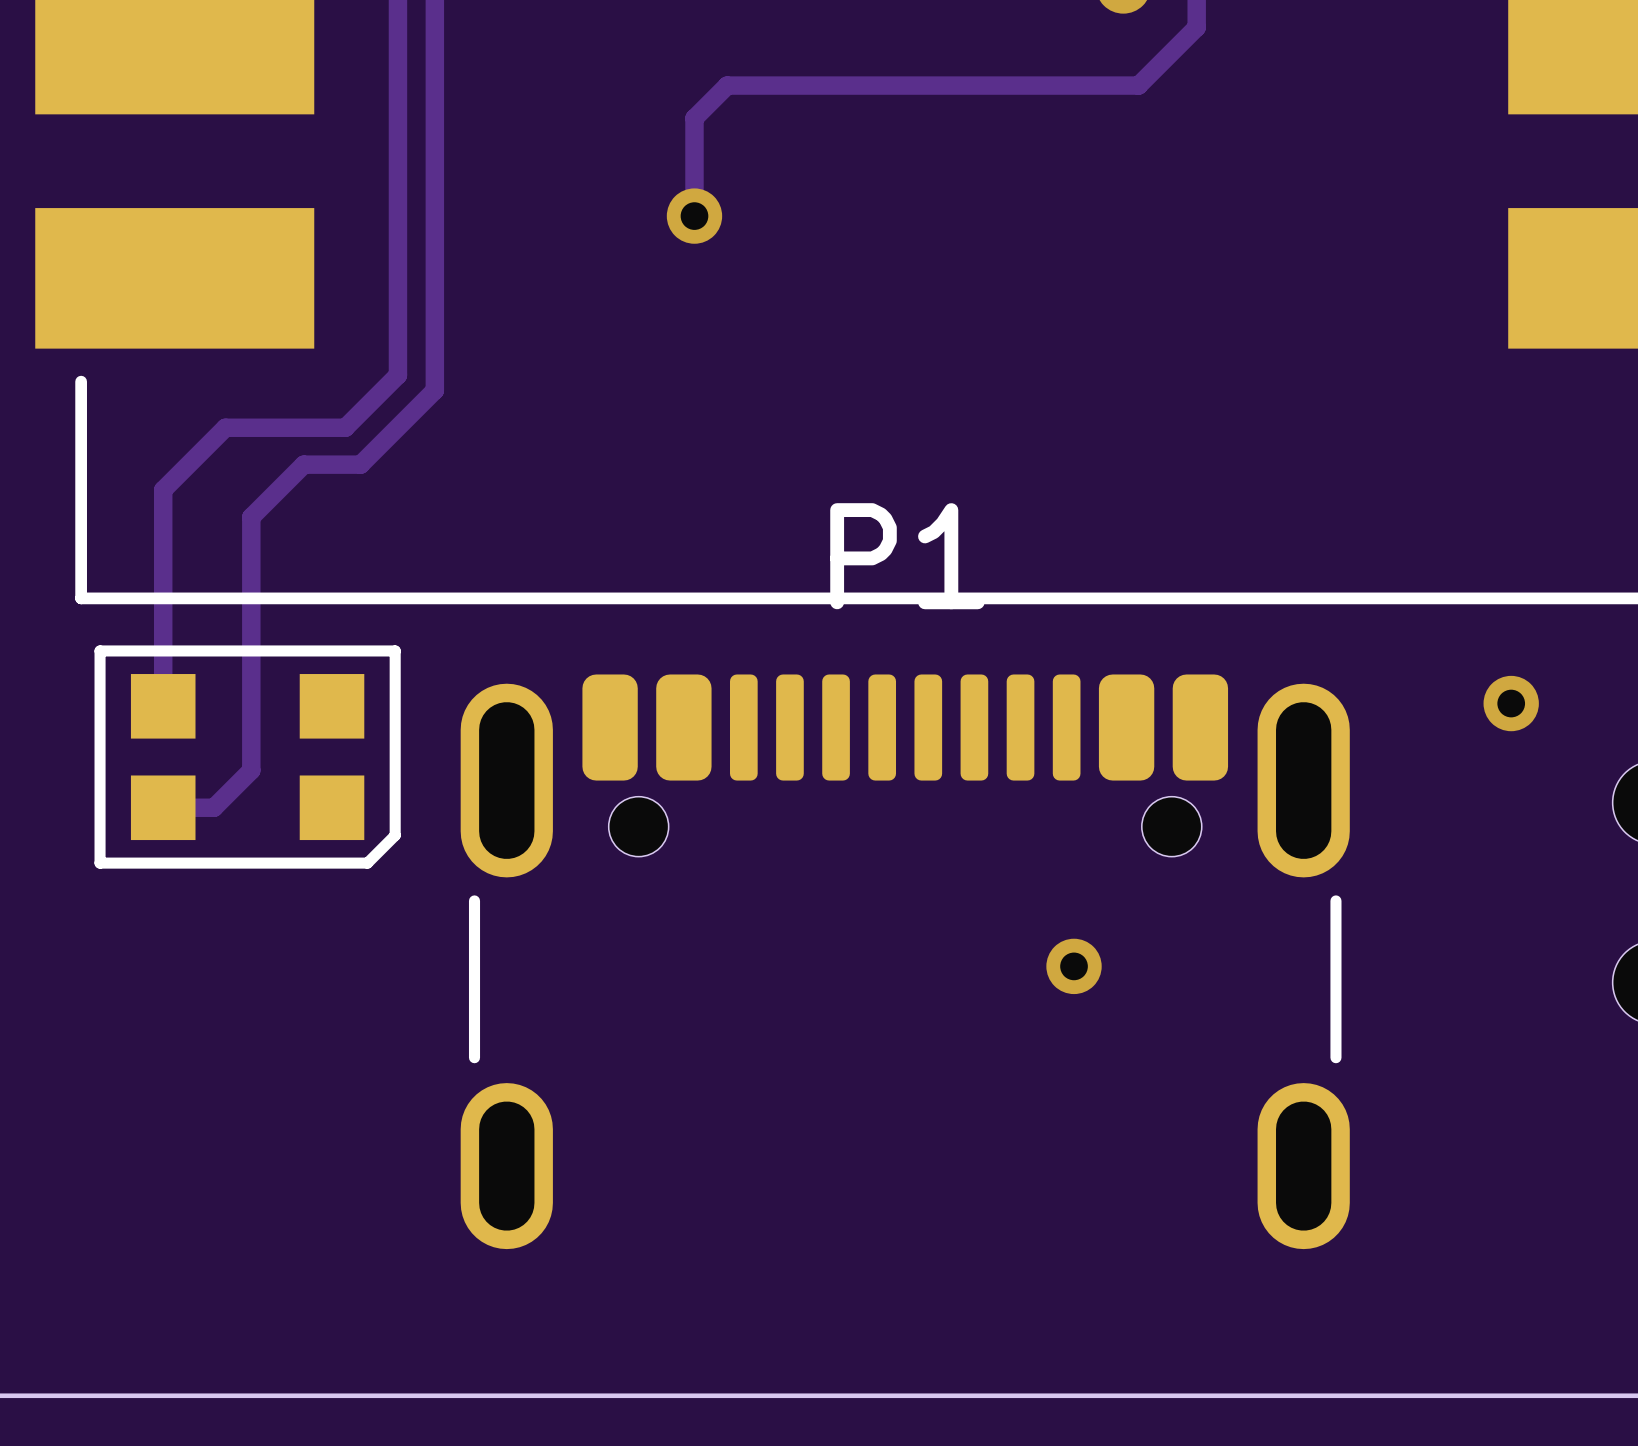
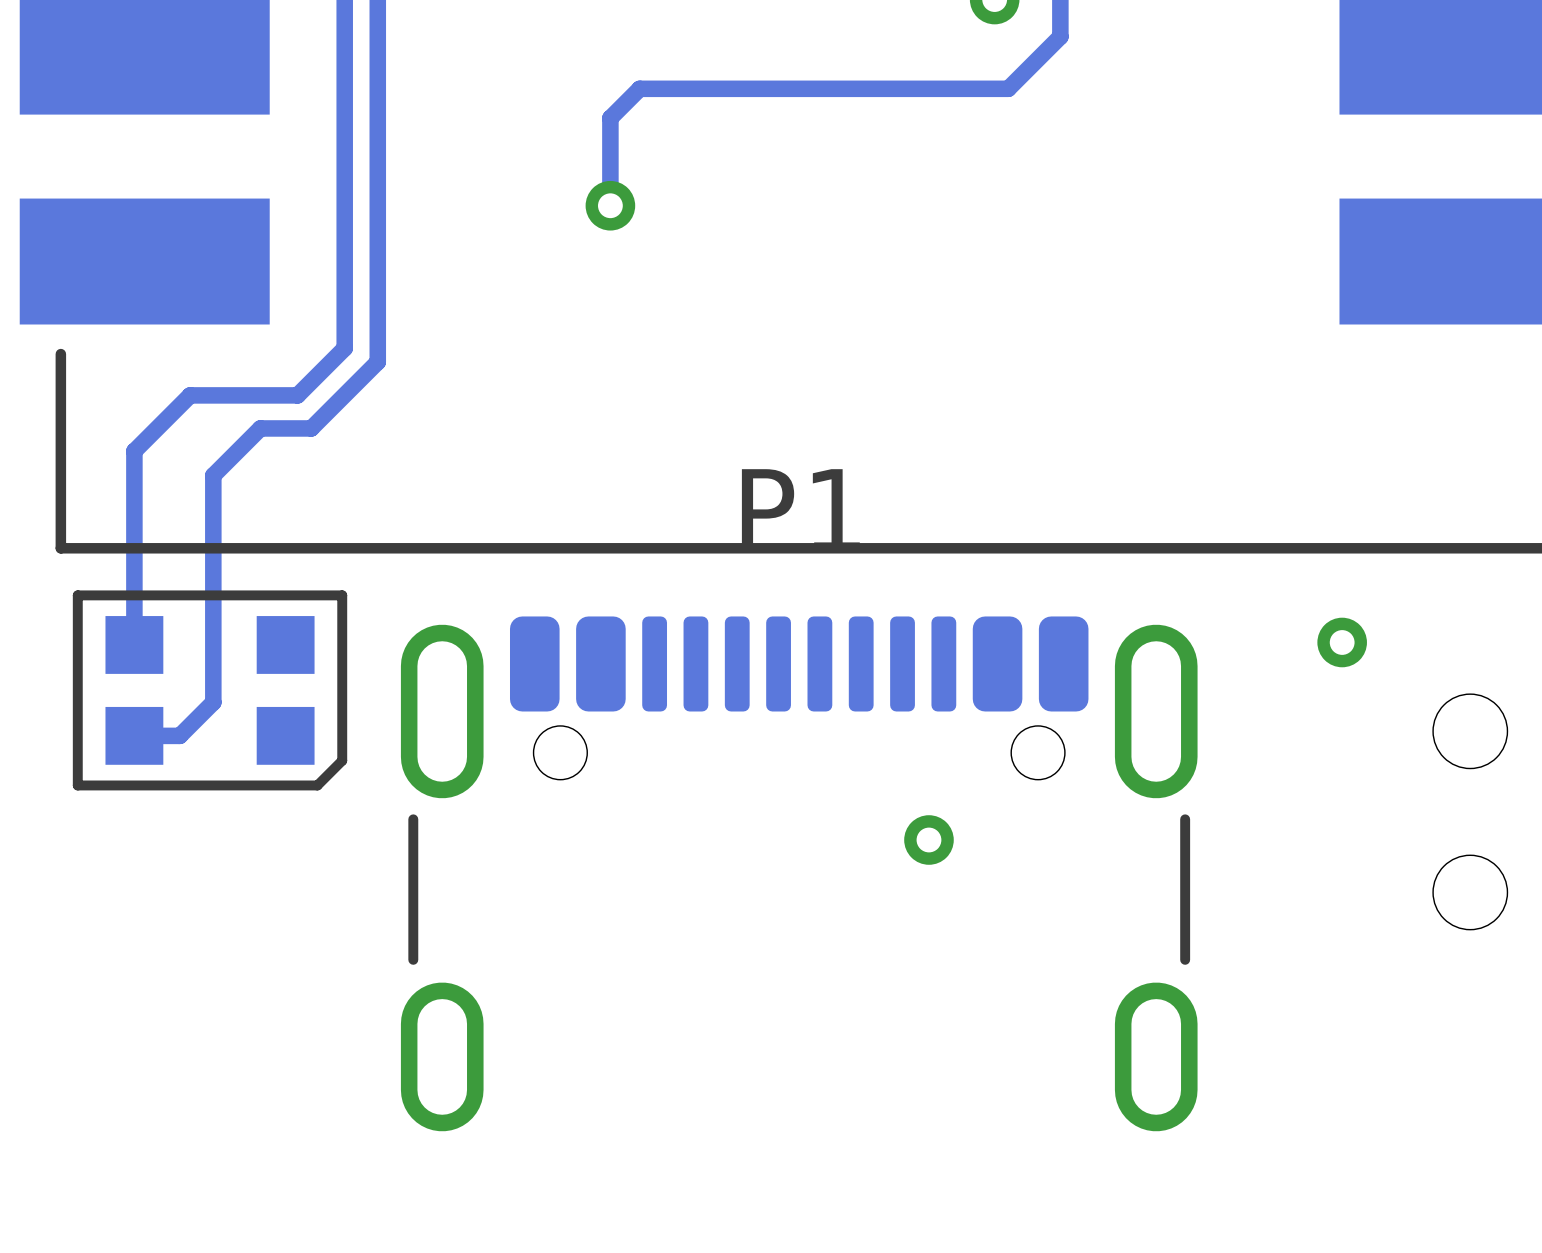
via position: (1074, 966) -> (928, 840)

